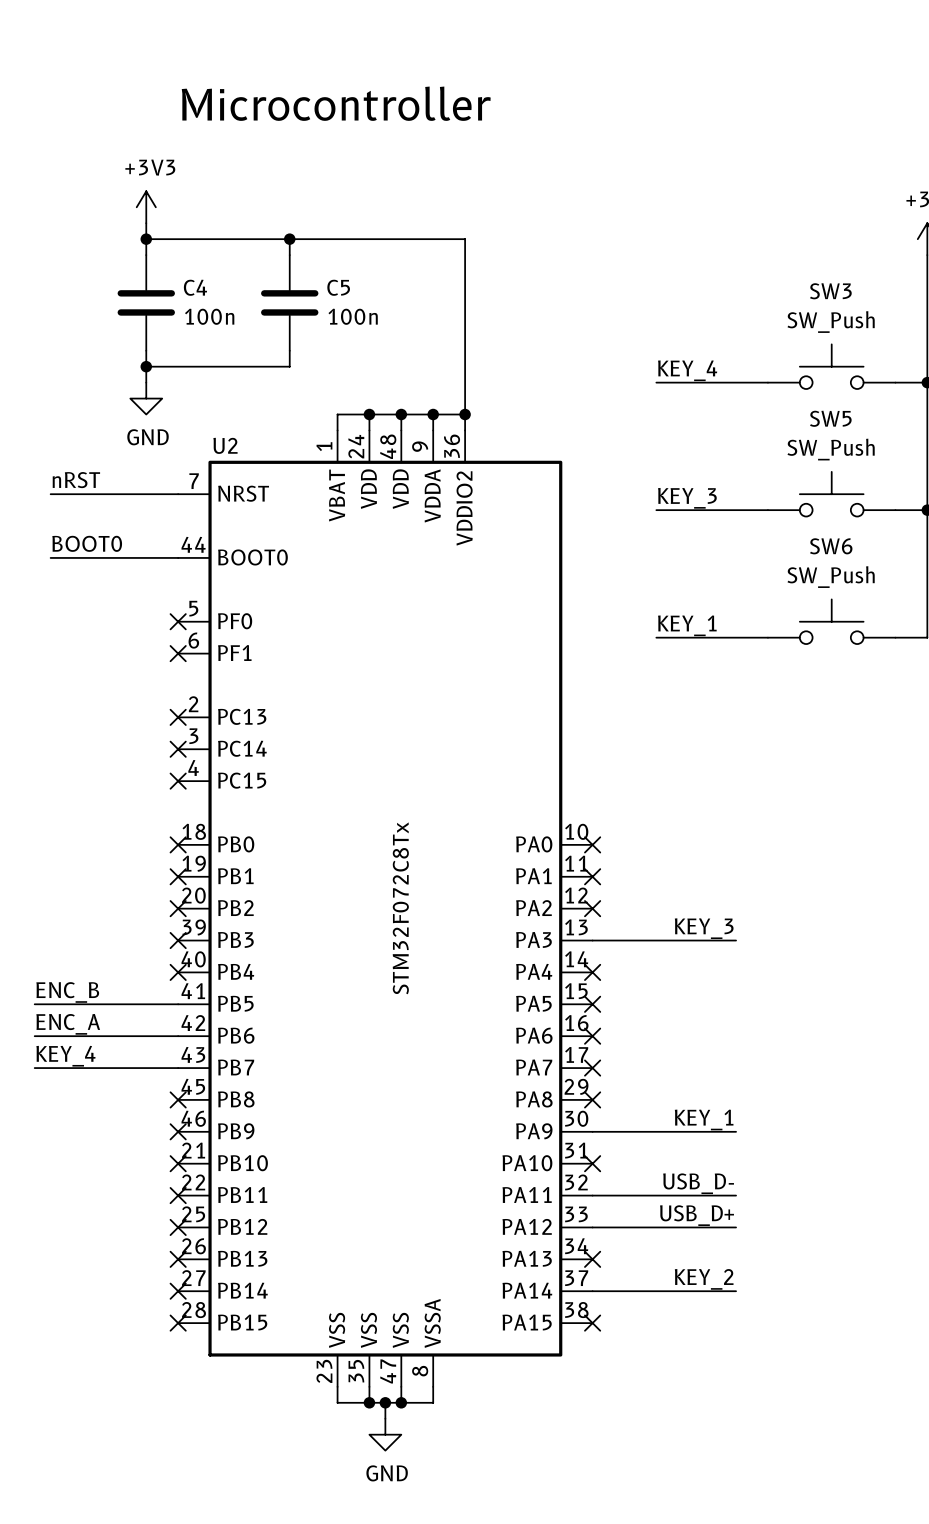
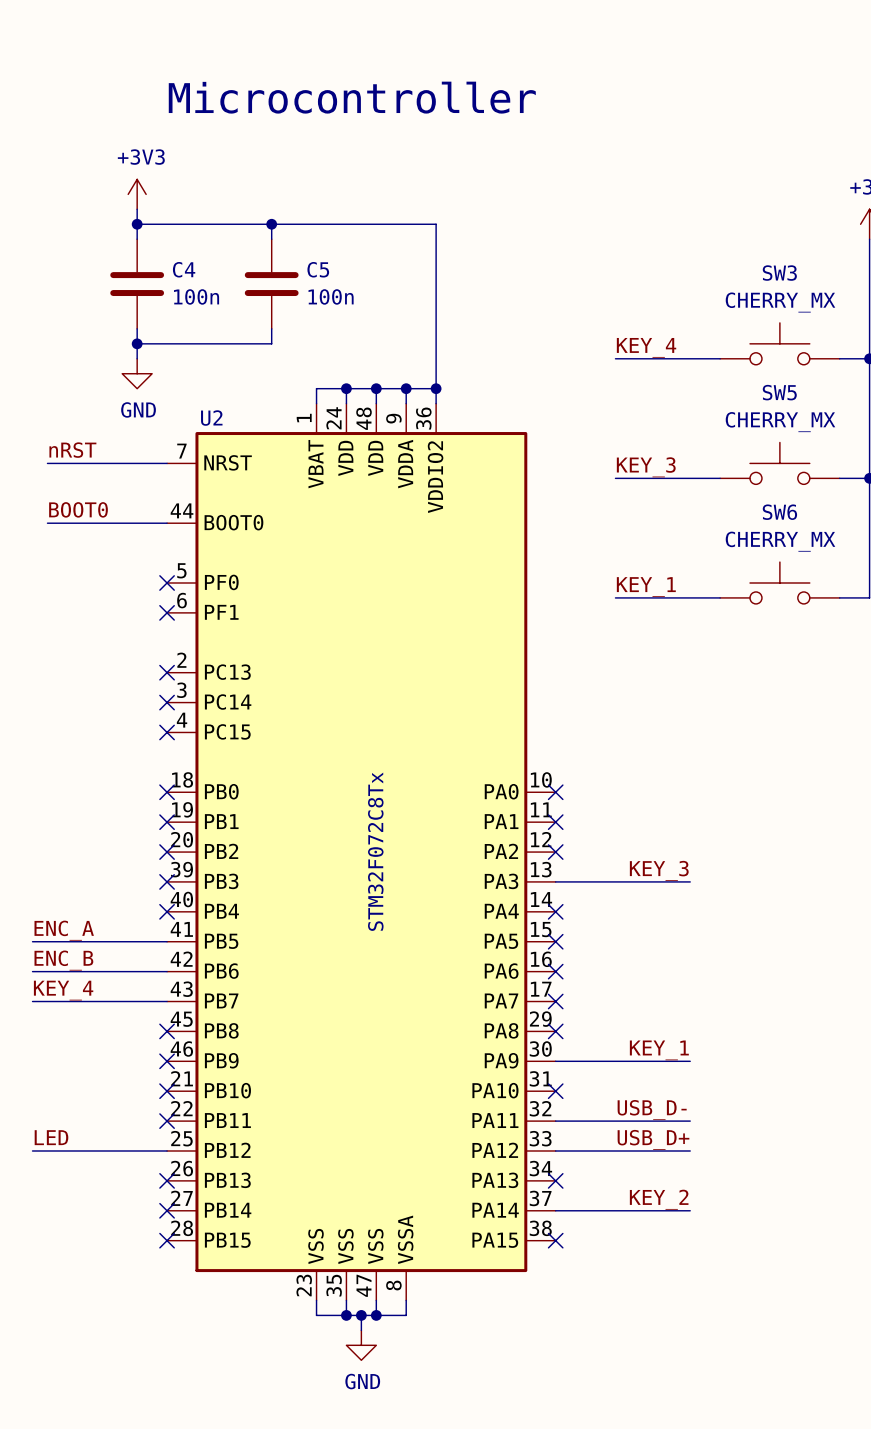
SW3 value: SW_Push (831, 322) -> CHERRY_MX (780, 302)
SW5 value: SW_Push (831, 449) -> CHERRY_MX (780, 422)
SW6 value: SW_Push (831, 577) -> CHERRY_MX (780, 541)
label: ENC_B (67, 992) -> ENC_A (64, 930)
label: ENC_A (68, 1024) -> ENC_B (63, 960)
label: none -> LED (51, 1137)
wire: none -> (32, 1150) (167, 1150)
no-connect mark: (178, 1227) -> none

